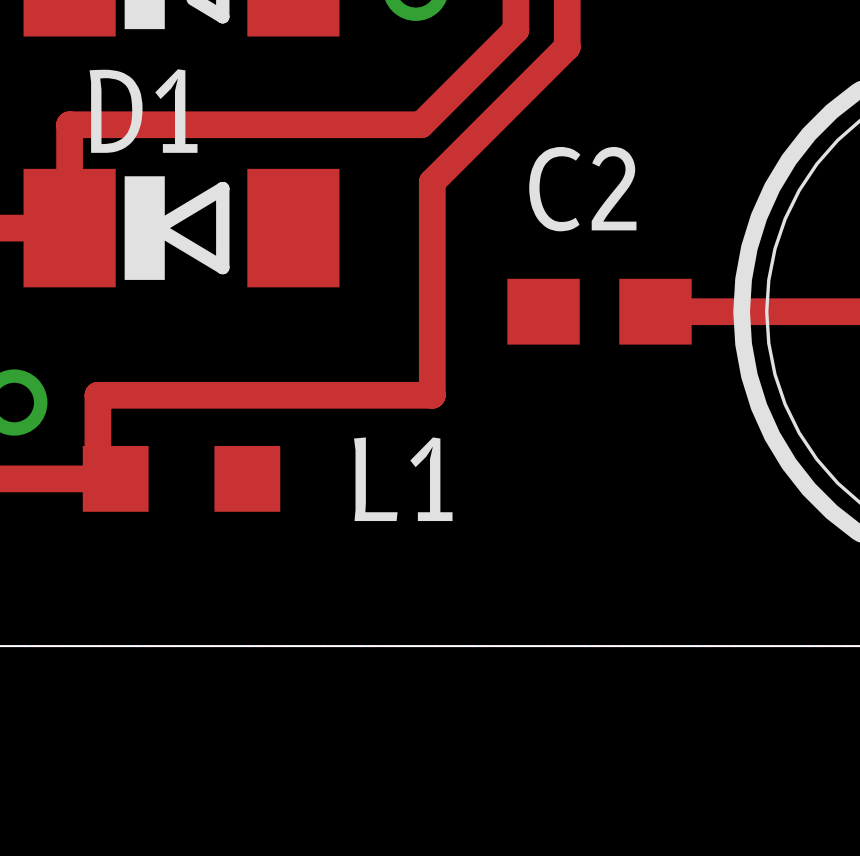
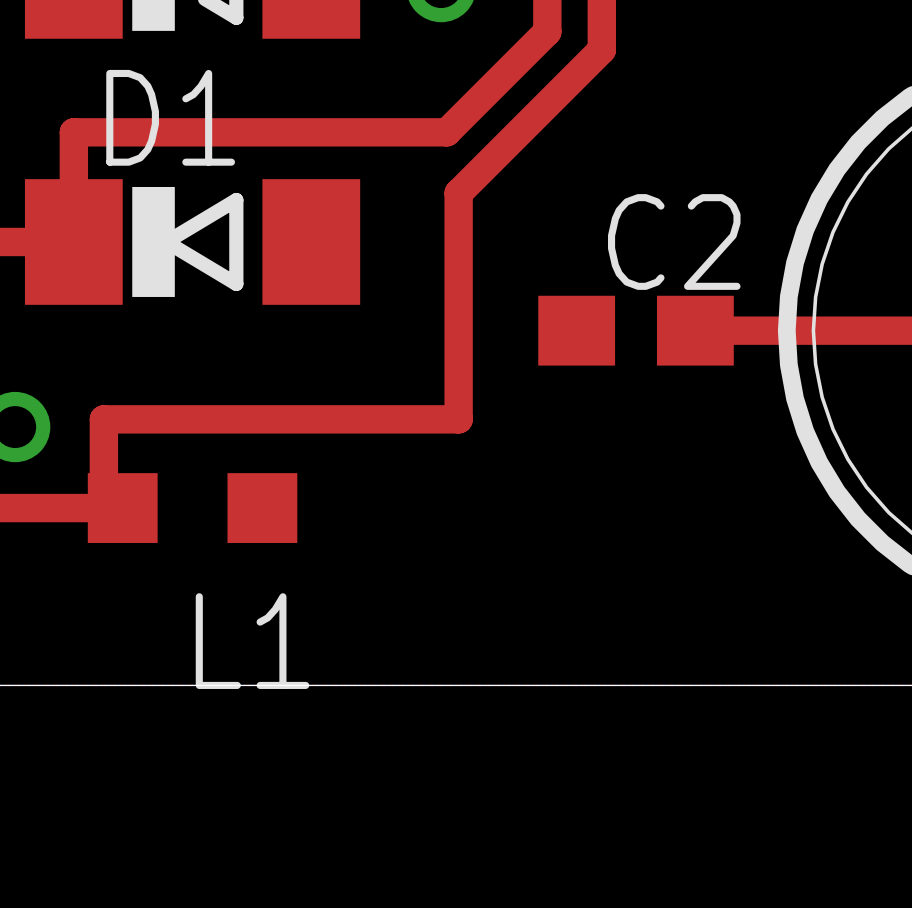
C2 name position: C2 (582, 189) -> C2 (674, 241)
L1 name position: L1 (403, 479) -> L1 (252, 641)

